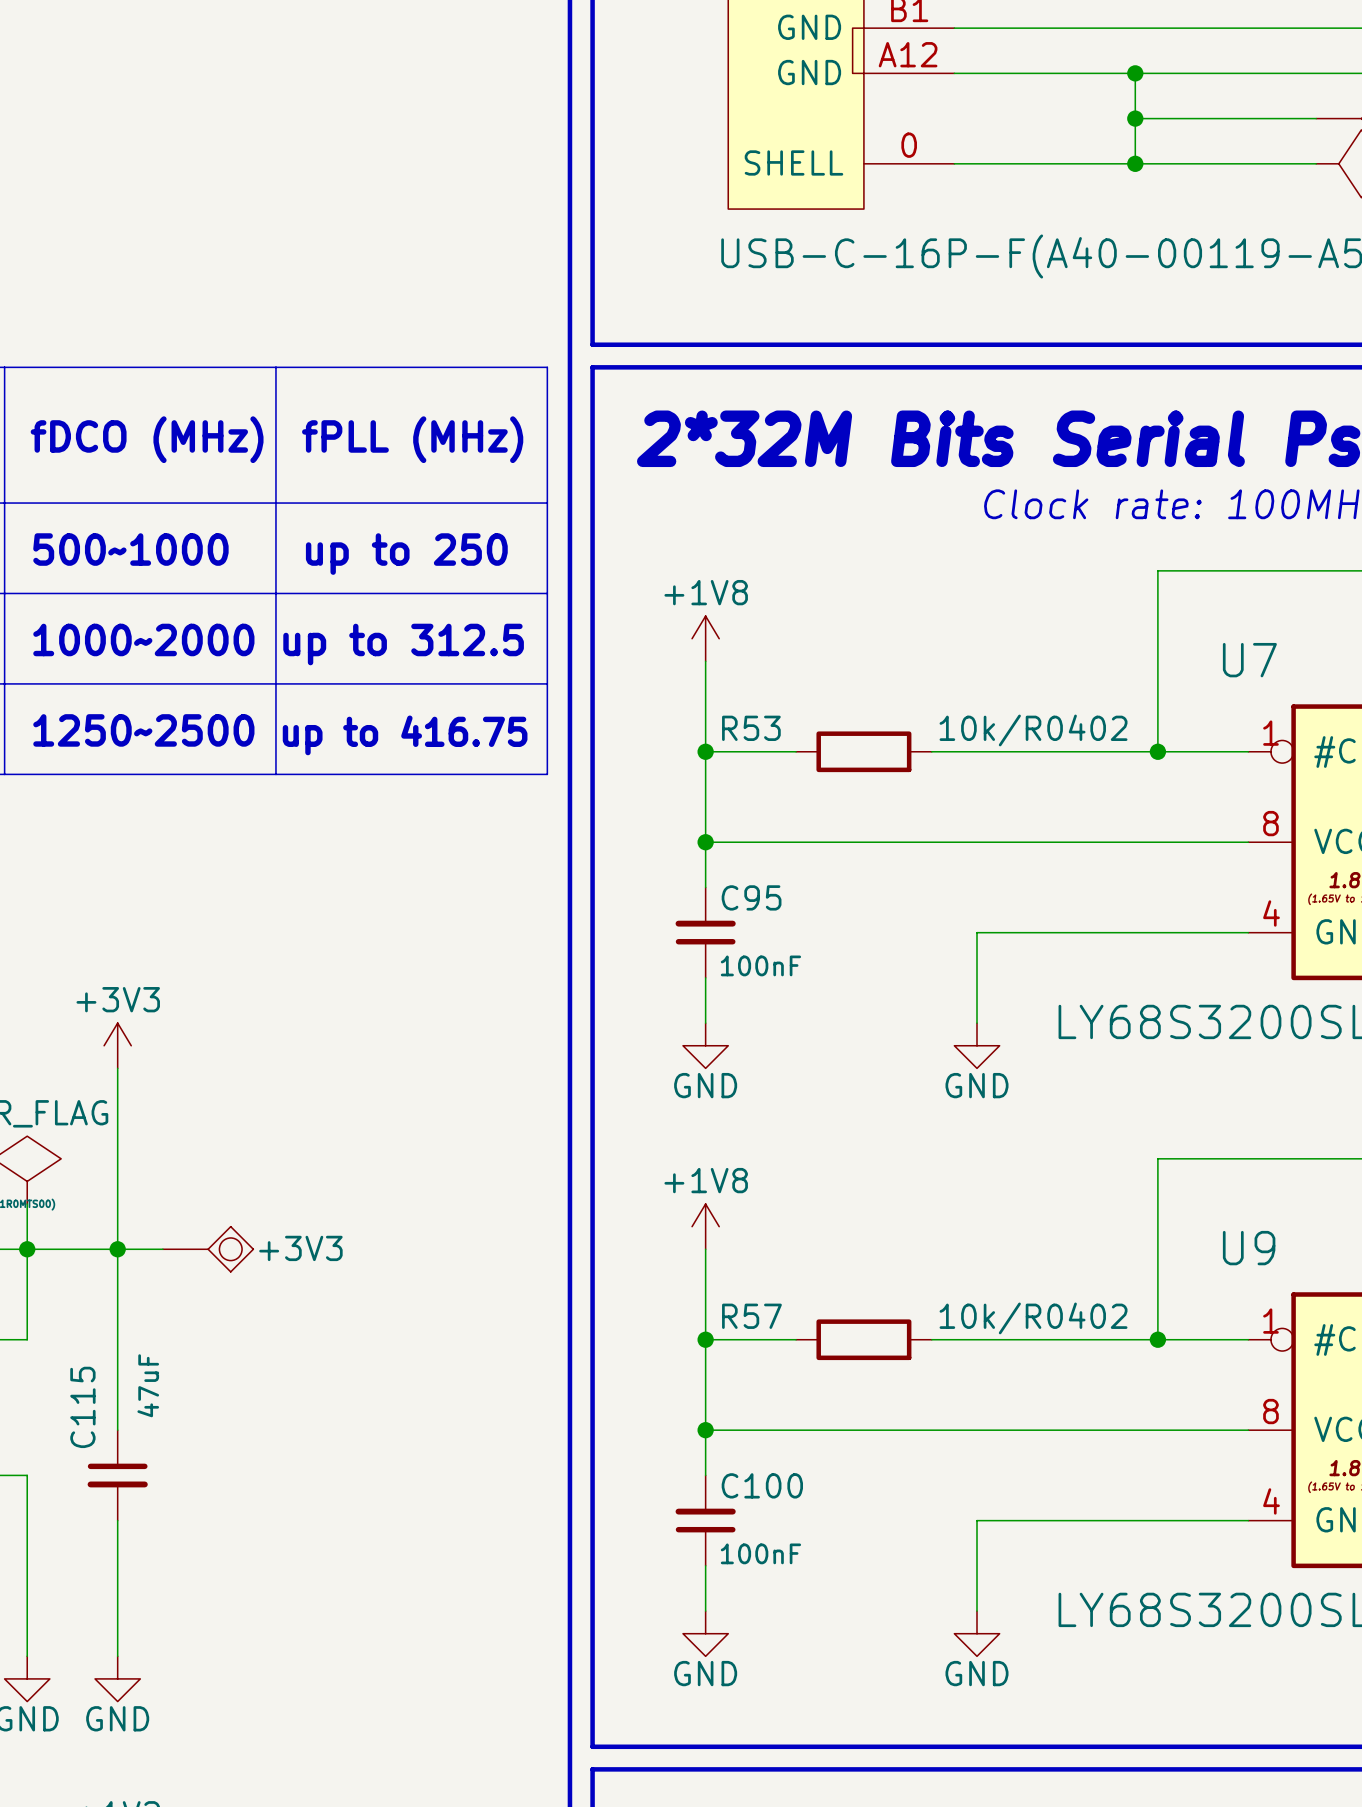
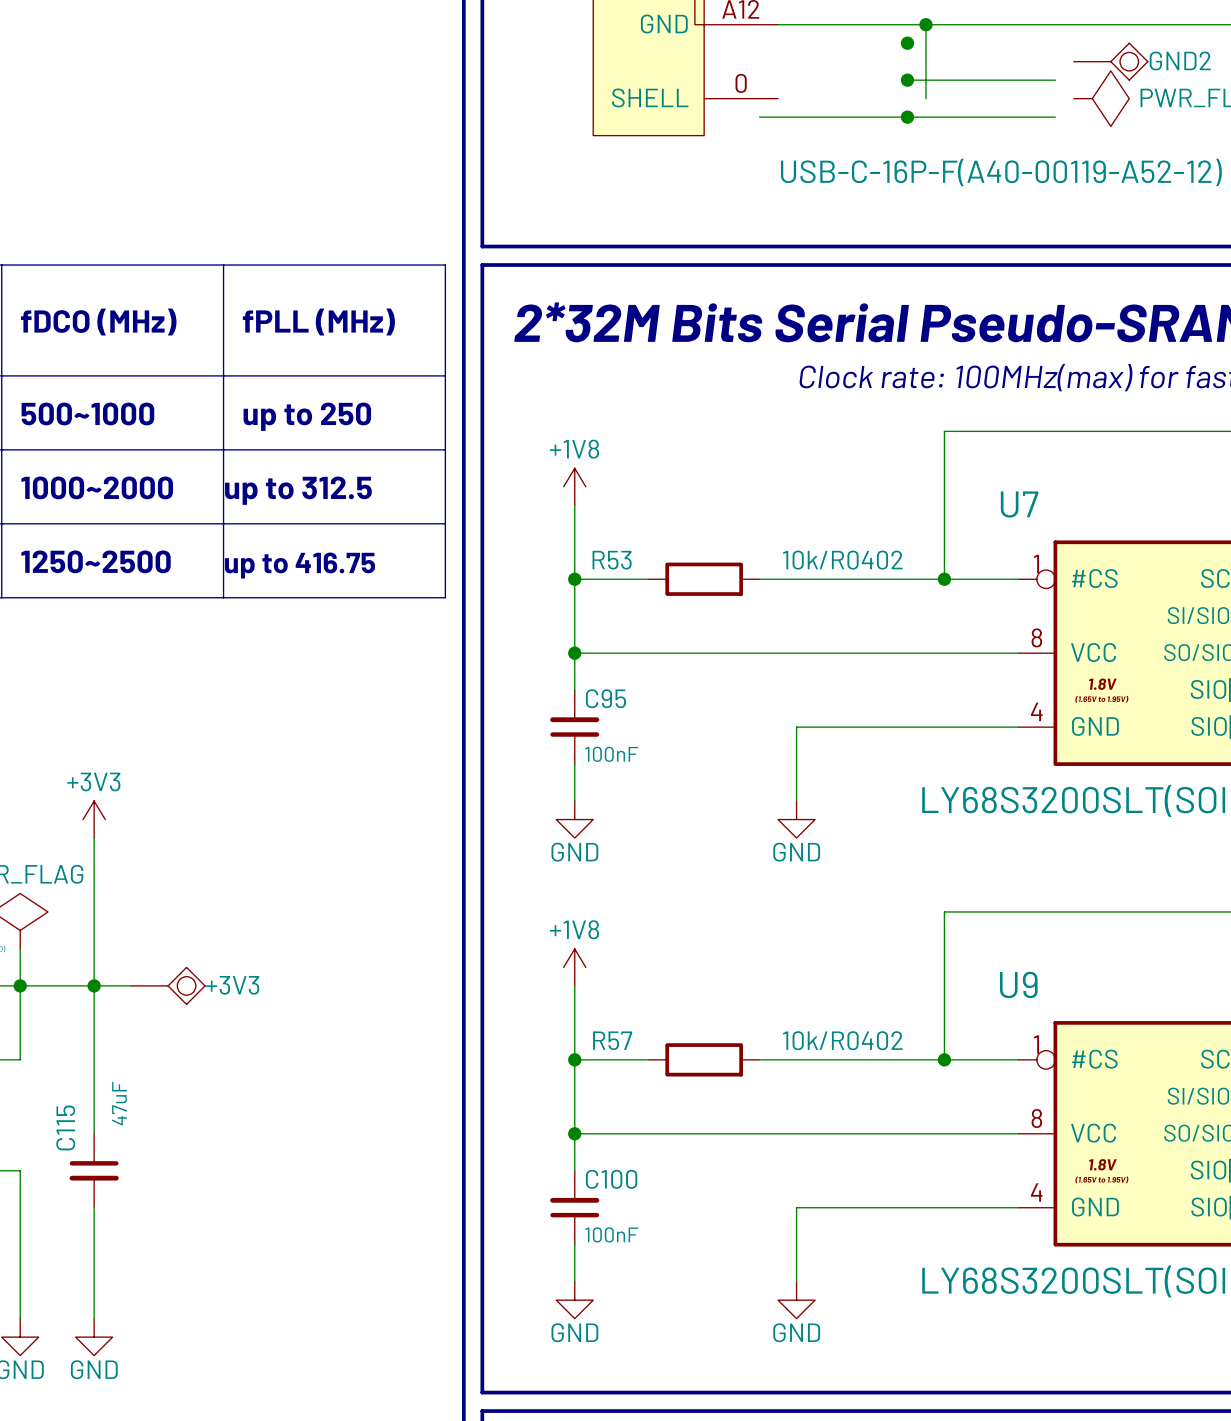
junction: none -> (907, 43)
wire: (1135, 118) (1316, 118) -> (907, 80) (1055, 80)
junction: (1135, 118) -> none
junction: none -> (907, 80)
wire: (954, 163) (1316, 163) -> (759, 117) (1055, 117)
junction: (1135, 163) -> none
junction: none -> (907, 117)

